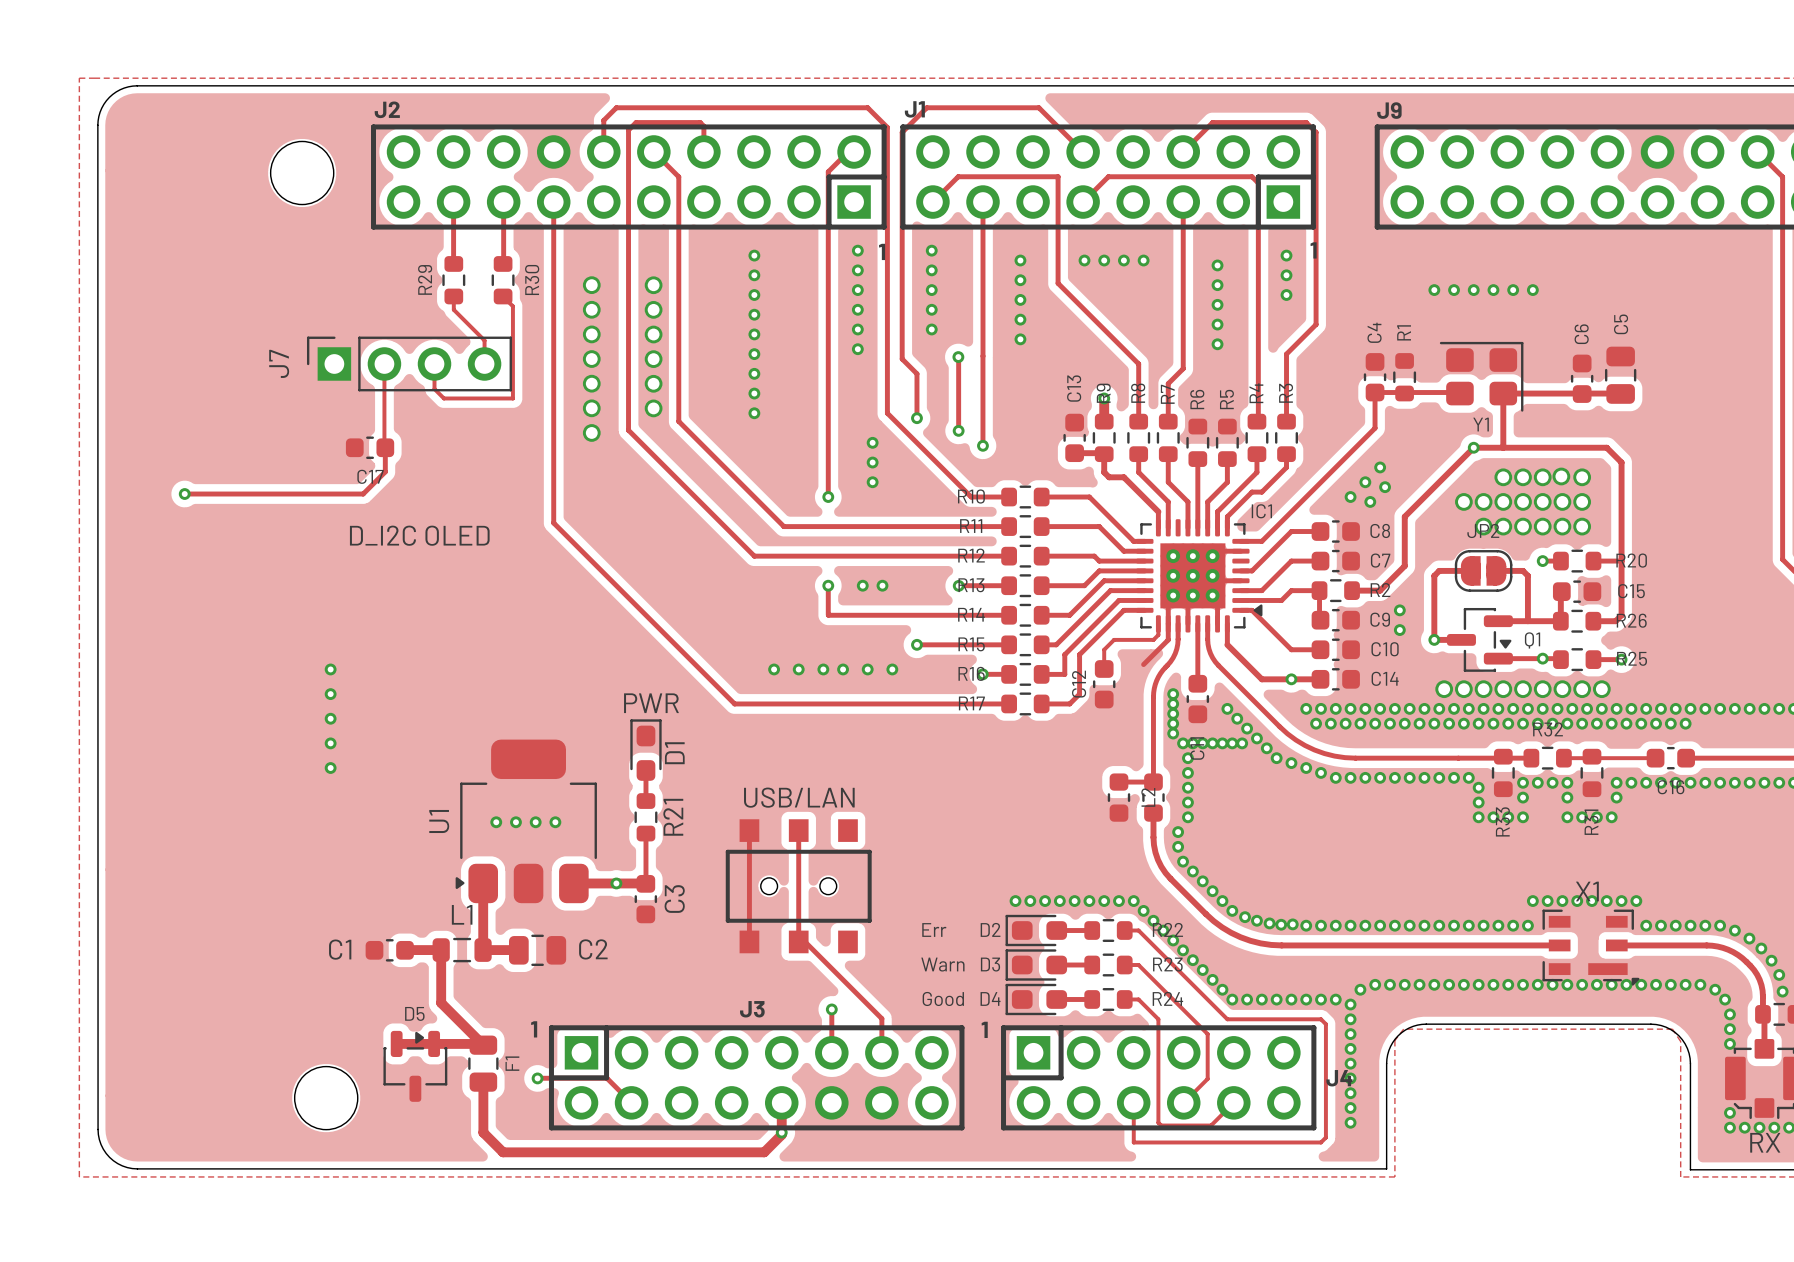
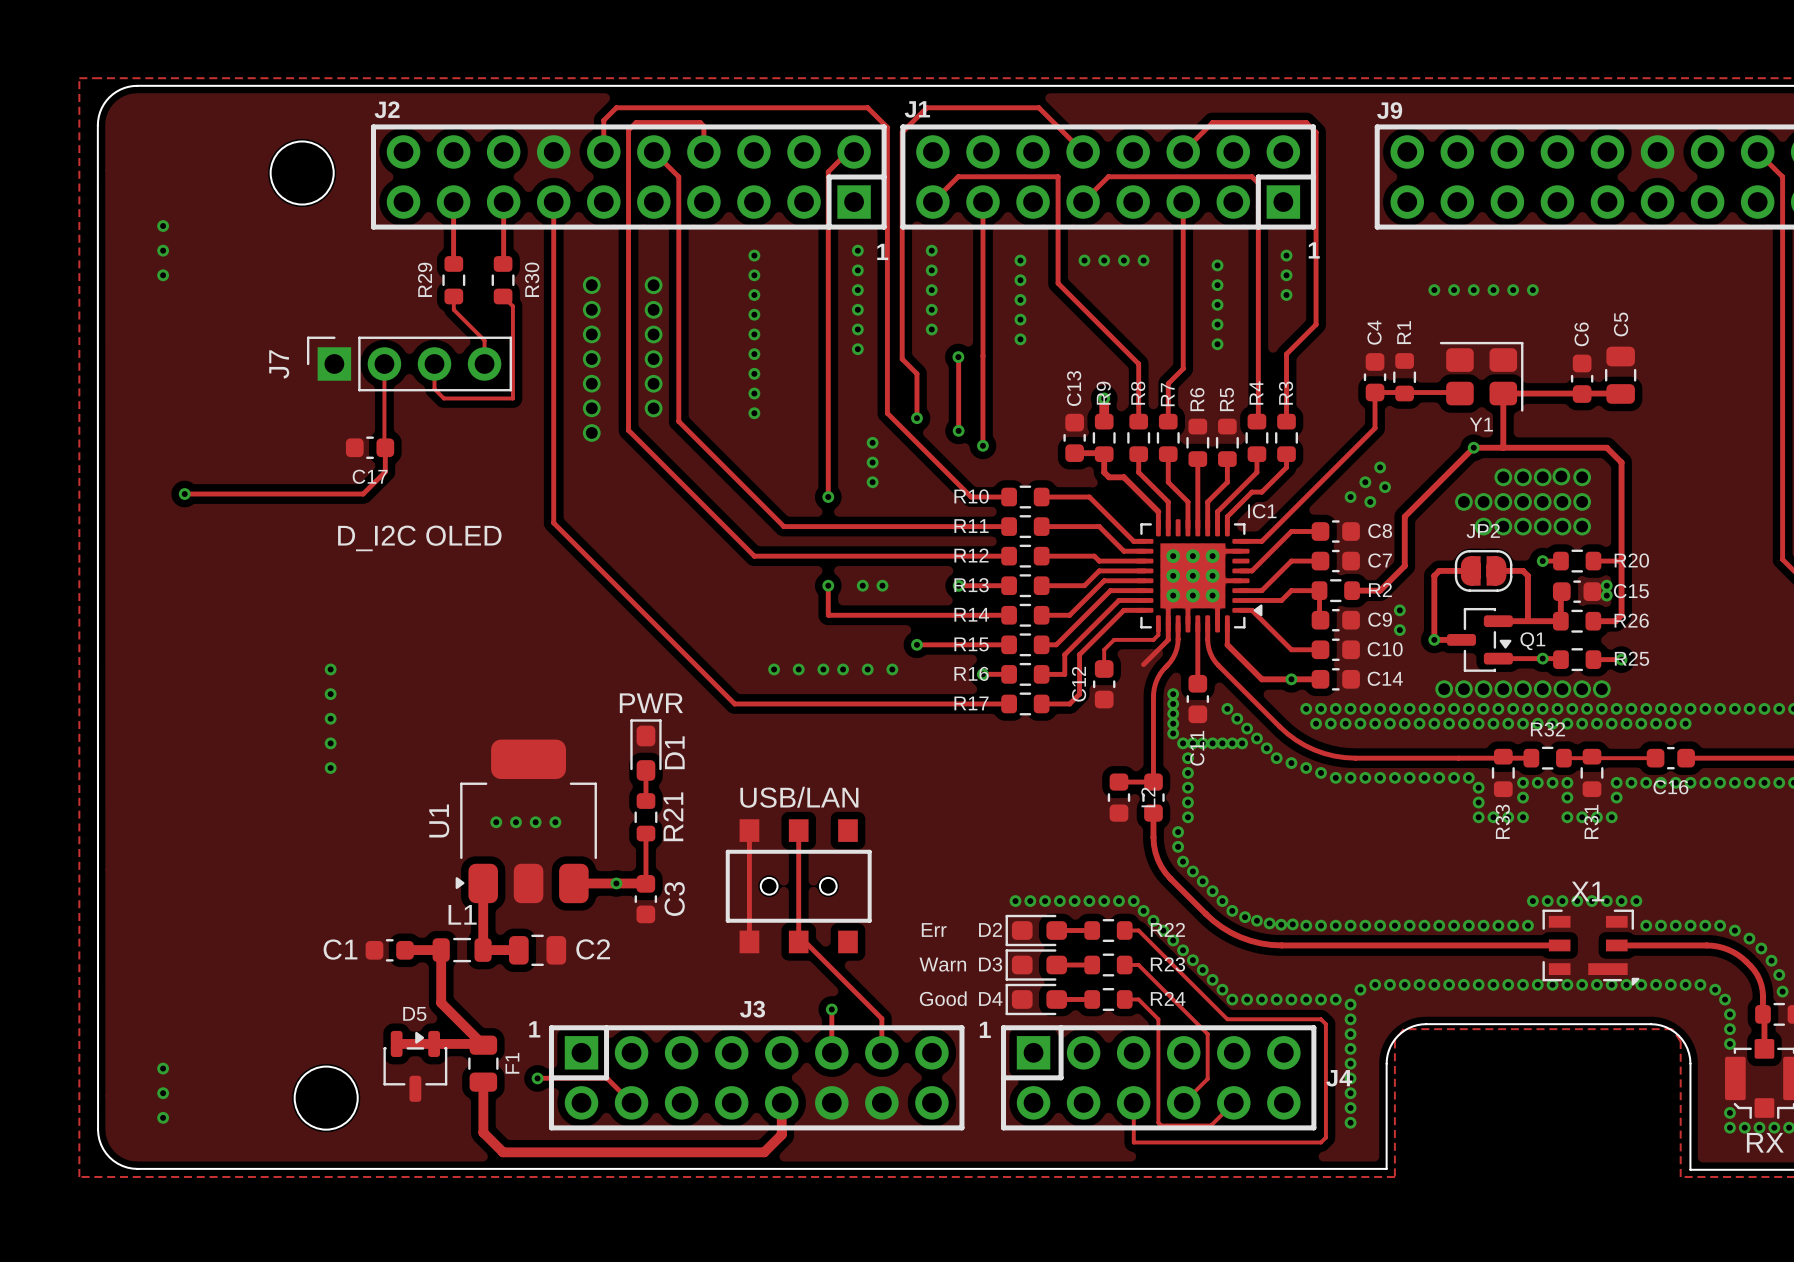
via: none -> (163, 226)
via: none -> (163, 250)
via: none -> (163, 275)
via: none -> (1606, 585)
via: none -> (1606, 595)
via: none -> (163, 1068)
via: none -> (163, 1093)
via: none -> (163, 1117)
via: (781, 1132) -> none

